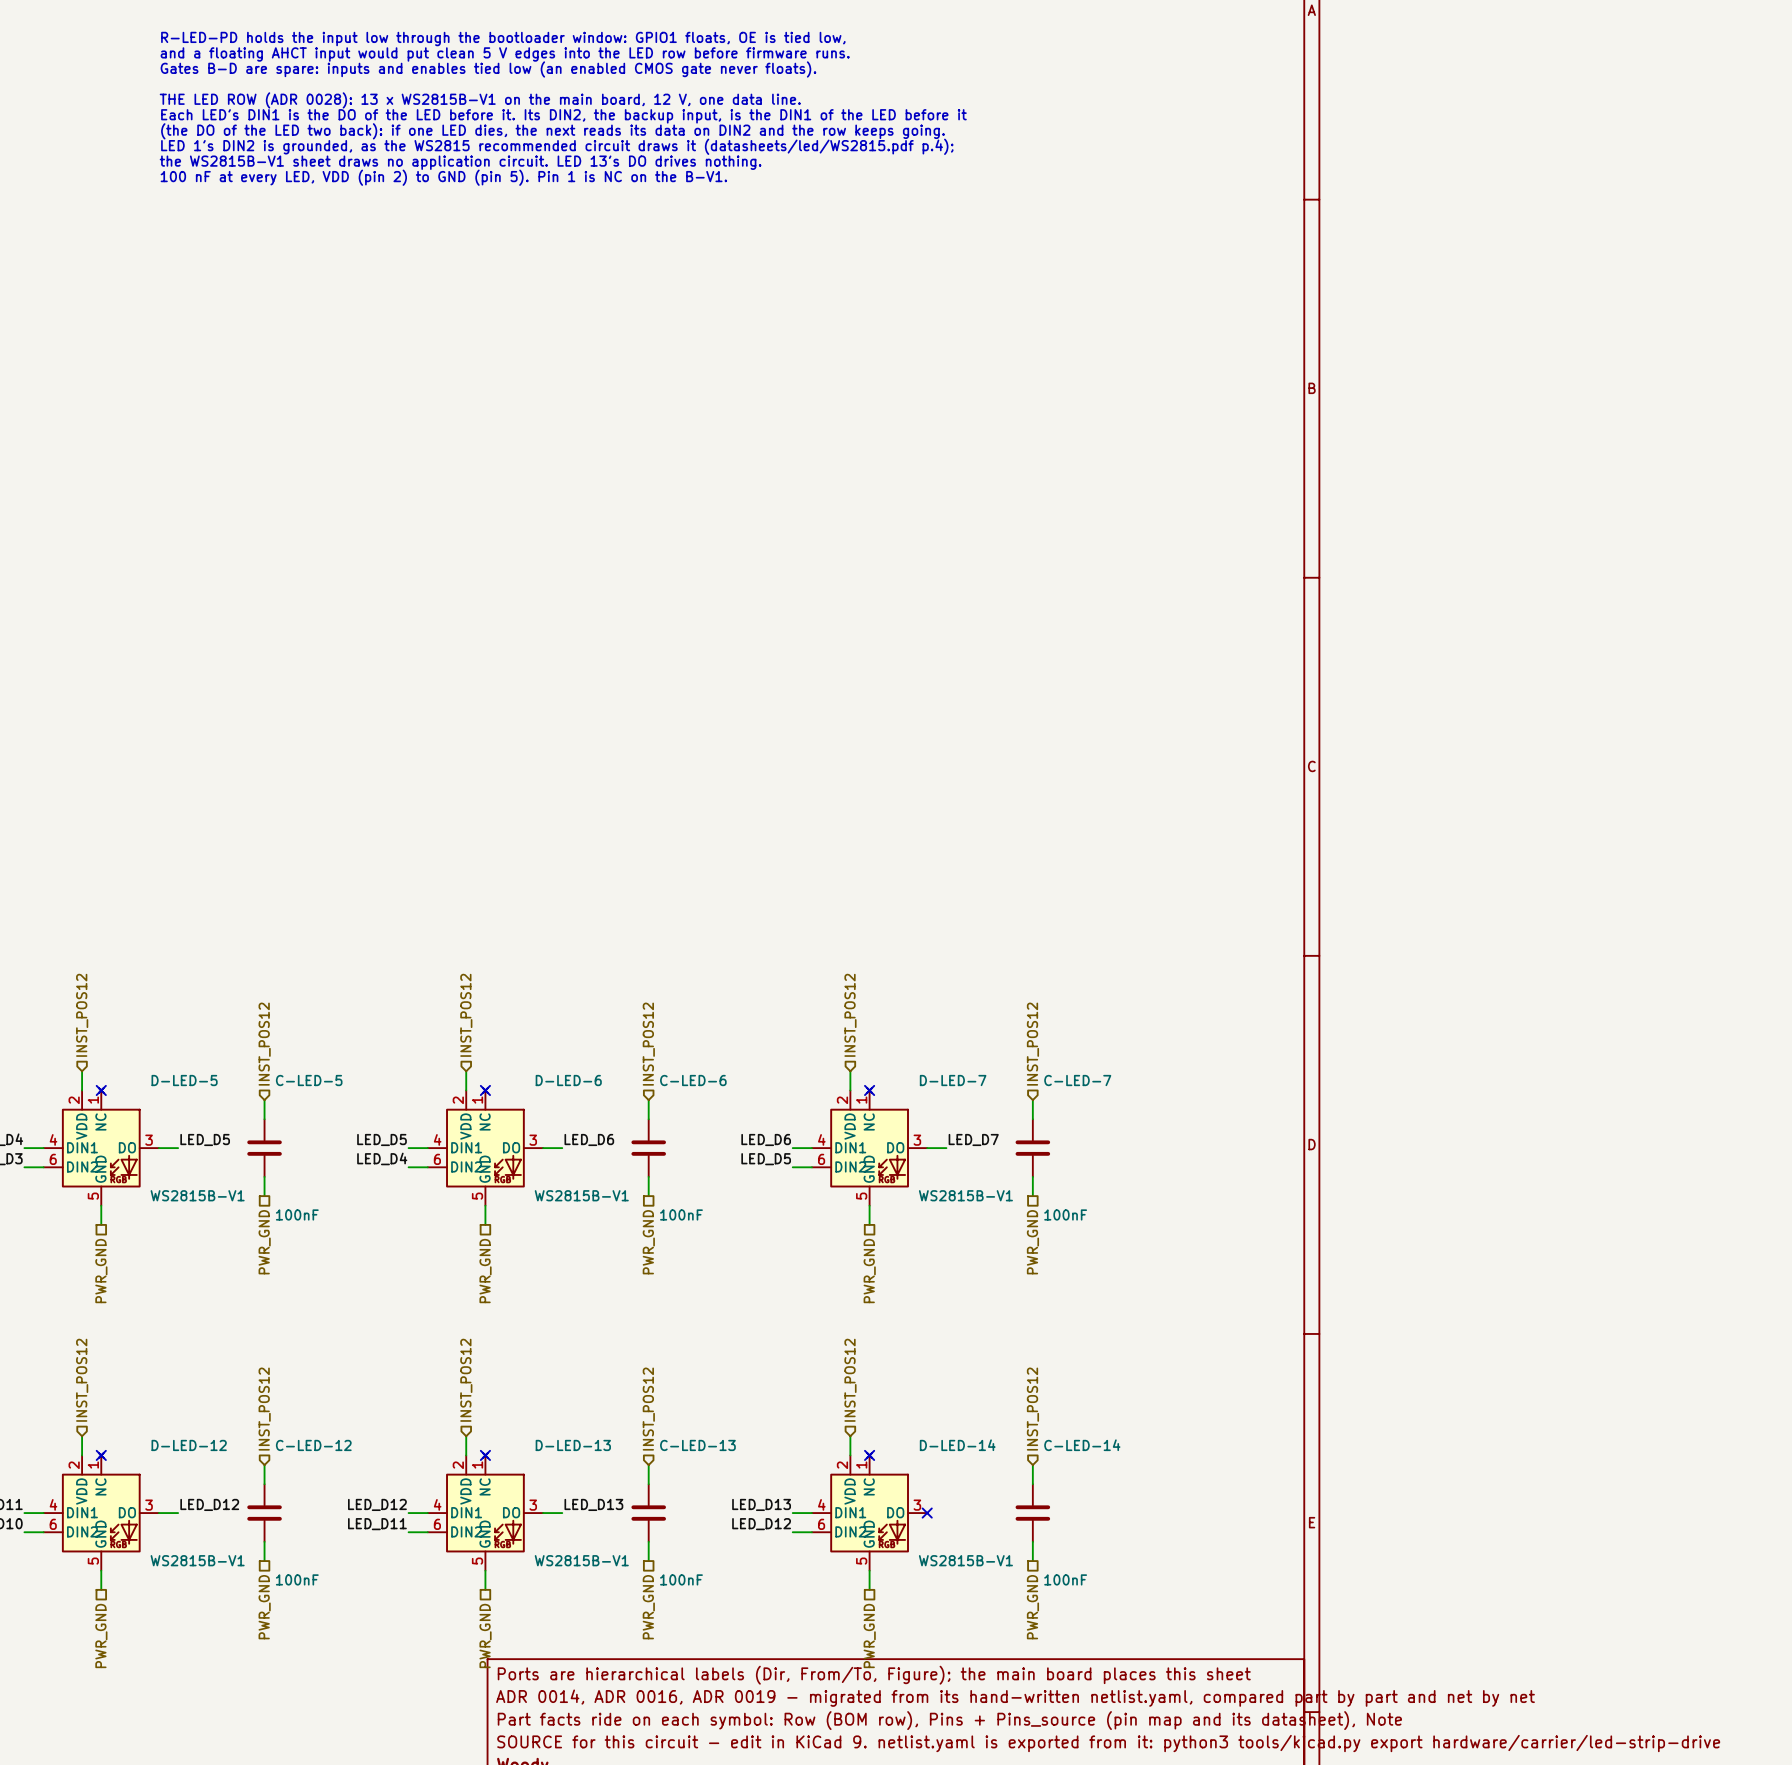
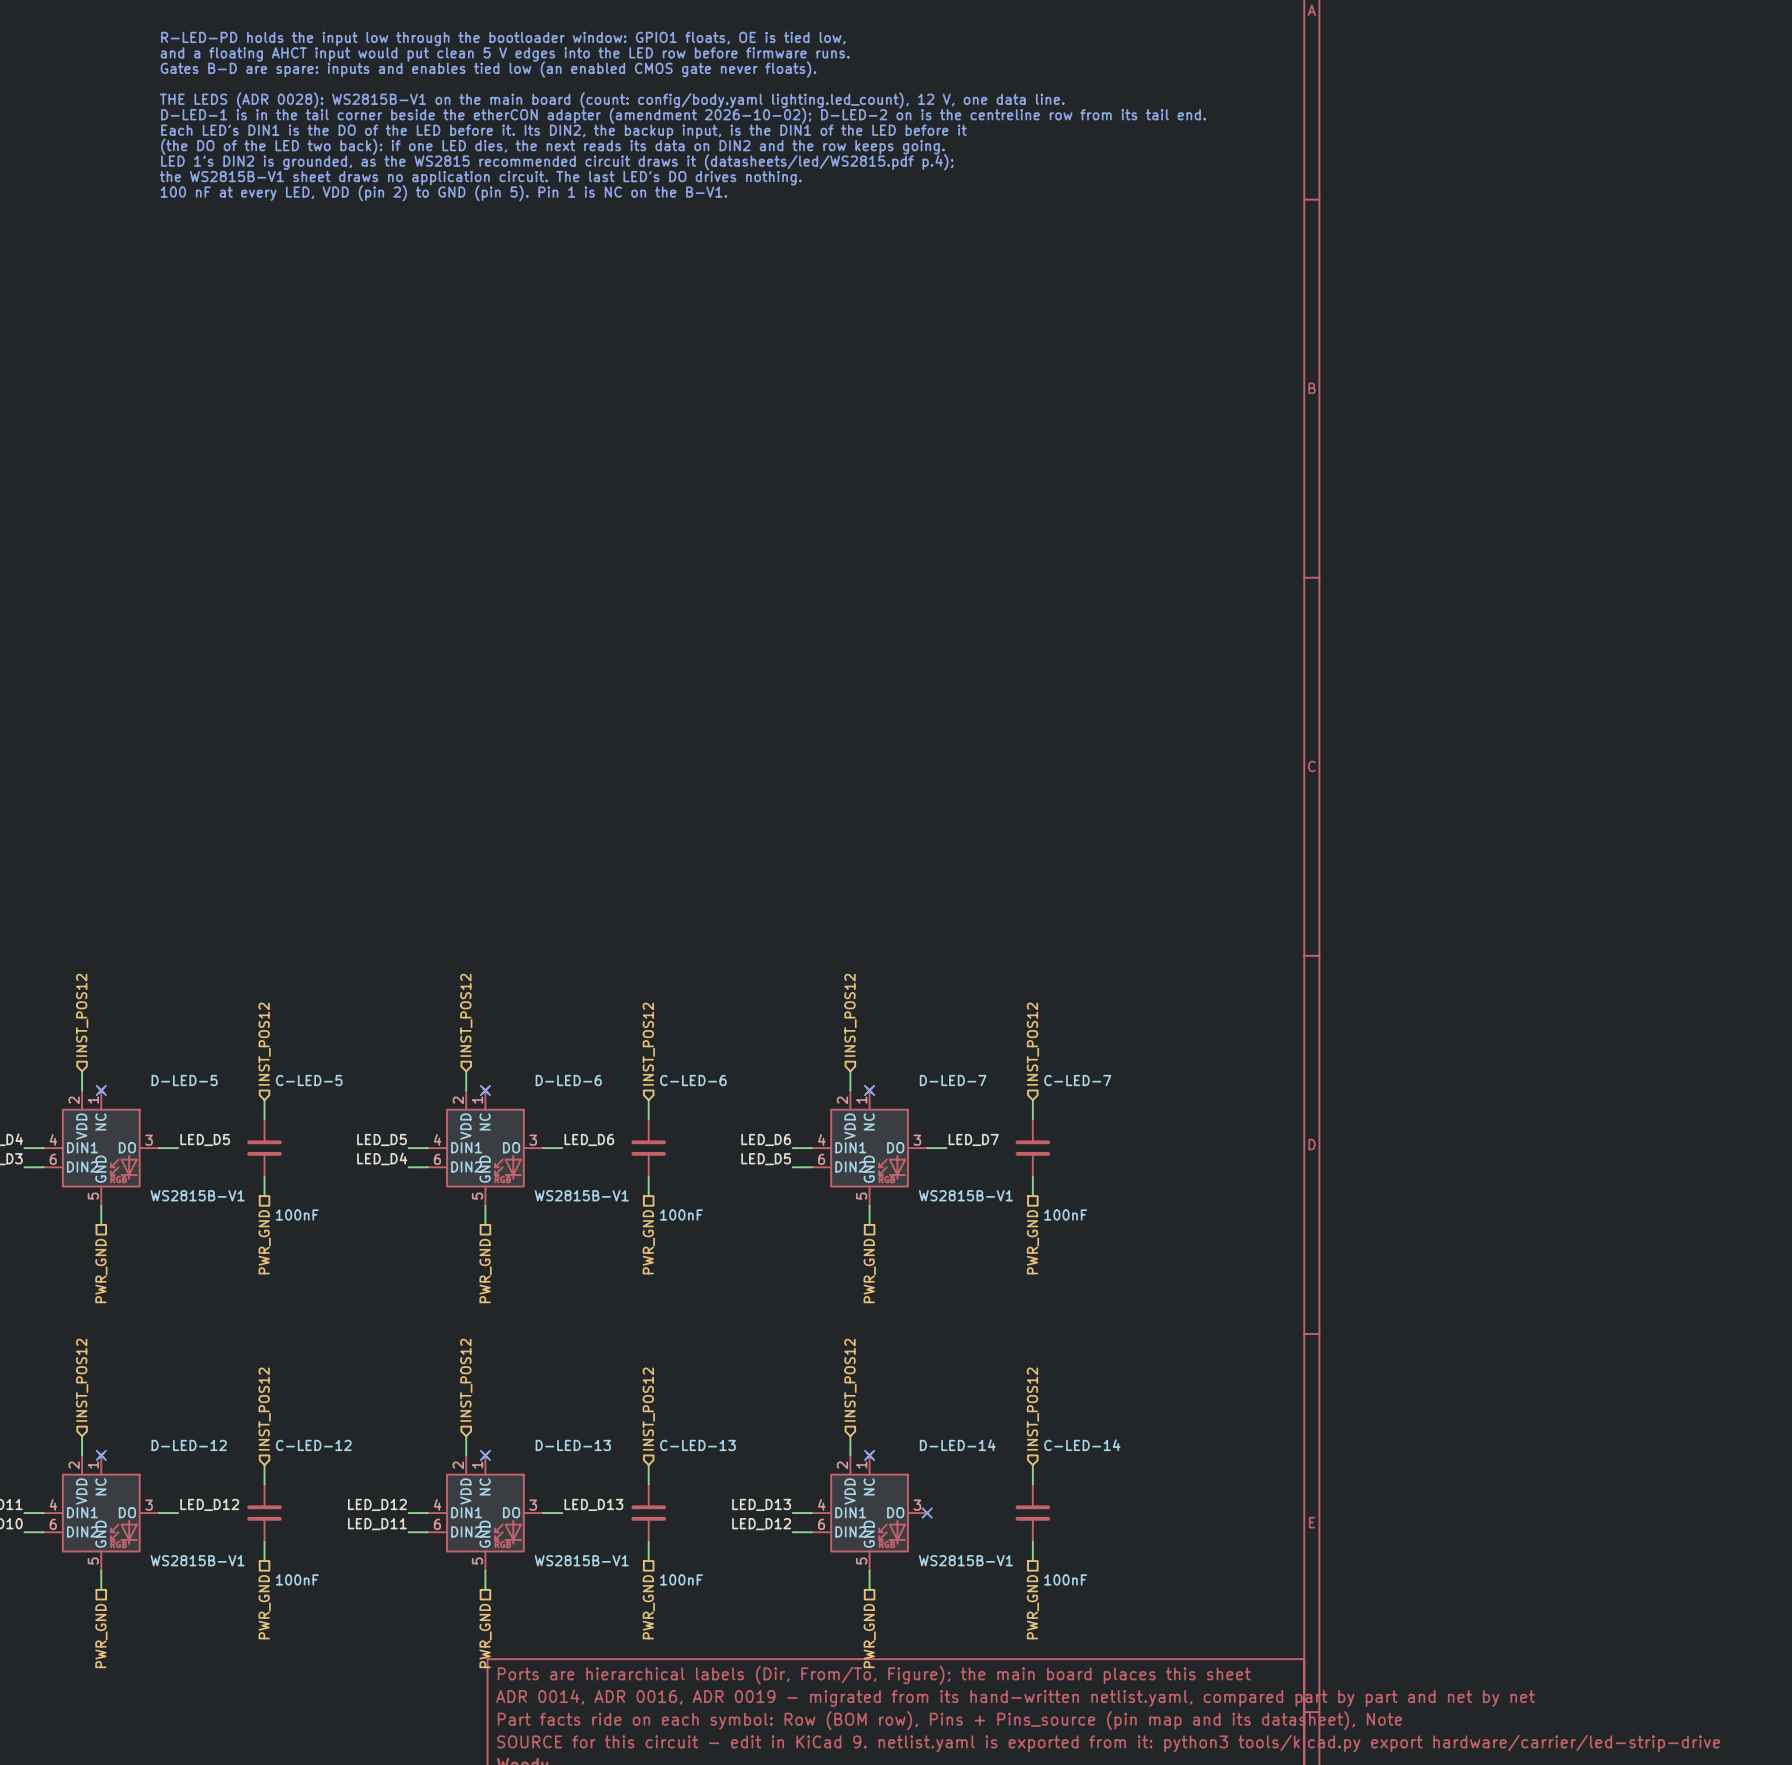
text: THE LED ROW (ADR 0028): 13 x WS2815B-V1 on the main board, 12 V, one data line. (480, 100) -> THE LEDS (ADR 0028): WS2815B-V1 on the main board (count: config/body.yaml lighting.led_count), 12 V, one data line. (612, 100)
text: Each LED's DIN1 is the DO of the LED before it. Its DIN2, the backup input, is the DIN1 of the LED before it (563, 116) -> D-LED-1 is in the tail corner beside the etherCON adapter (amendment 2026-10-02); D-LED-2 on is the centreline row from its tail end. (683, 115)
text: (the DO of the LED two back): if one LED dies, the next reads its data on DIN2 and the row keeps going. (552, 131) -> Each LED's DIN1 is the DO of the LED before it. Its DIN2, the backup input, is the DIN1 of the LED before it (563, 131)
text: LED 1's DIN2 is grounded, as the WS2815 recommended circuit draws it (datasheets/led/WS2815.pdf p.4); (557, 146) -> (the DO of the LED two back): if one LED dies, the next reads its data on DIN2 and the row keeps going. (552, 146)
text: the WS2815B-V1 sheet draws no application circuit. LED 13's DO drives nothing. (460, 162) -> LED 1's DIN2 is grounded, as the WS2815 recommended circuit draws it (datasheets/led/WS2815.pdf p.4); (557, 162)
text: 100 nF at every LED, VDD (pin 2) to GND (pin 5). Pin 1 is NC on the B-V1. (443, 177) -> the WS2815B-V1 sheet draws no application circuit. The last LED's DO drives nothing. (480, 178)
text: none -> 100 nF at every LED, VDD (pin 2) to GND (pin 5). Pin 1 is NC on the B-V1. (443, 193)

